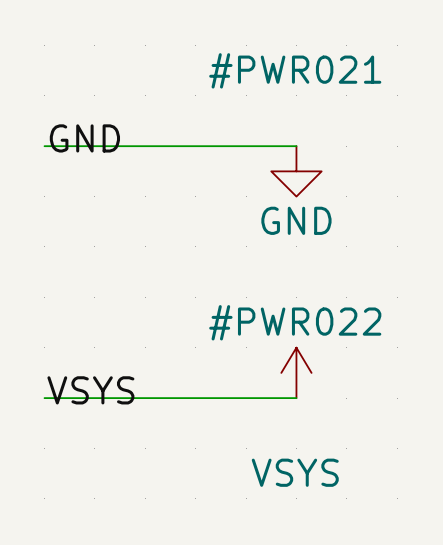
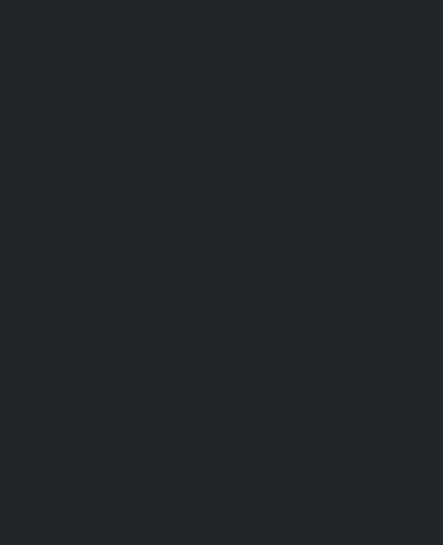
label: GND (84, 138) -> none
wire: (44, 146) (296, 146) -> none
#PWR021: GND (296, 171) -> none
#PWR022: VSYS (296, 372) -> none
label: VSYS (90, 390) -> none
wire: (44, 398) (296, 398) -> none

